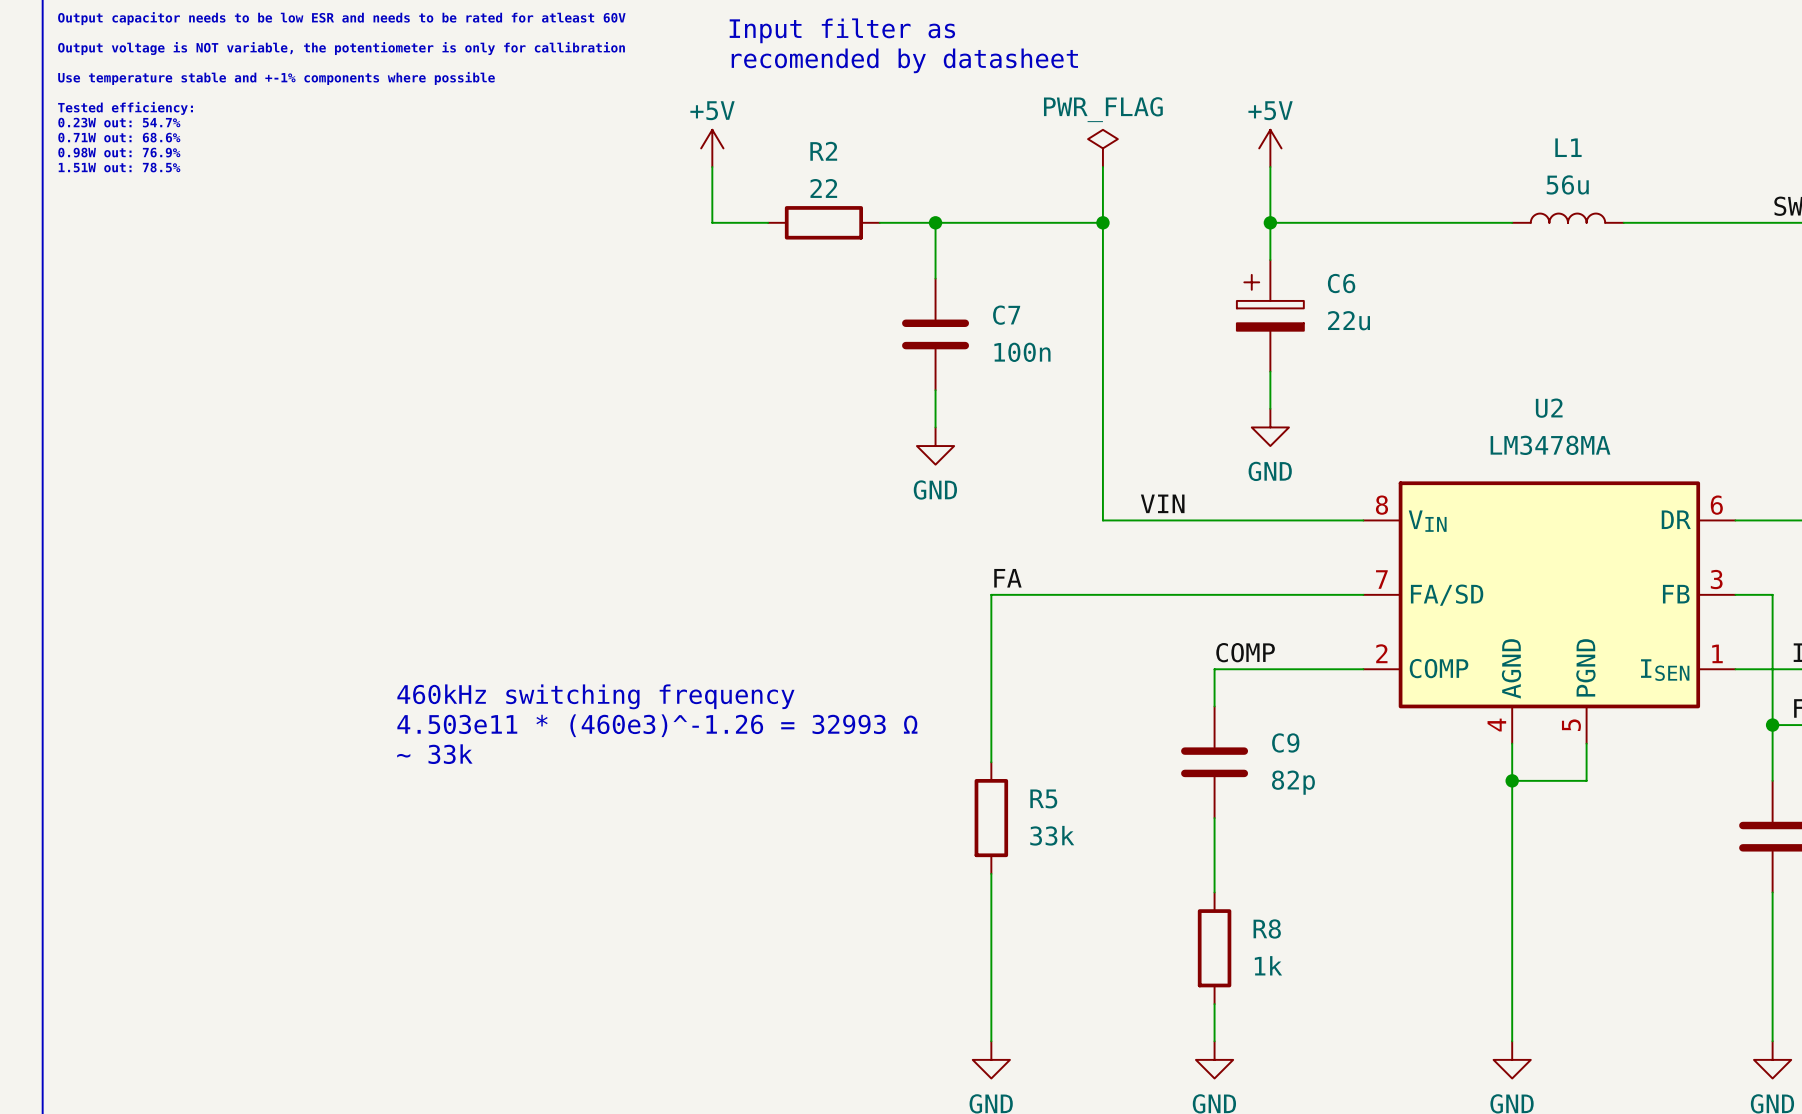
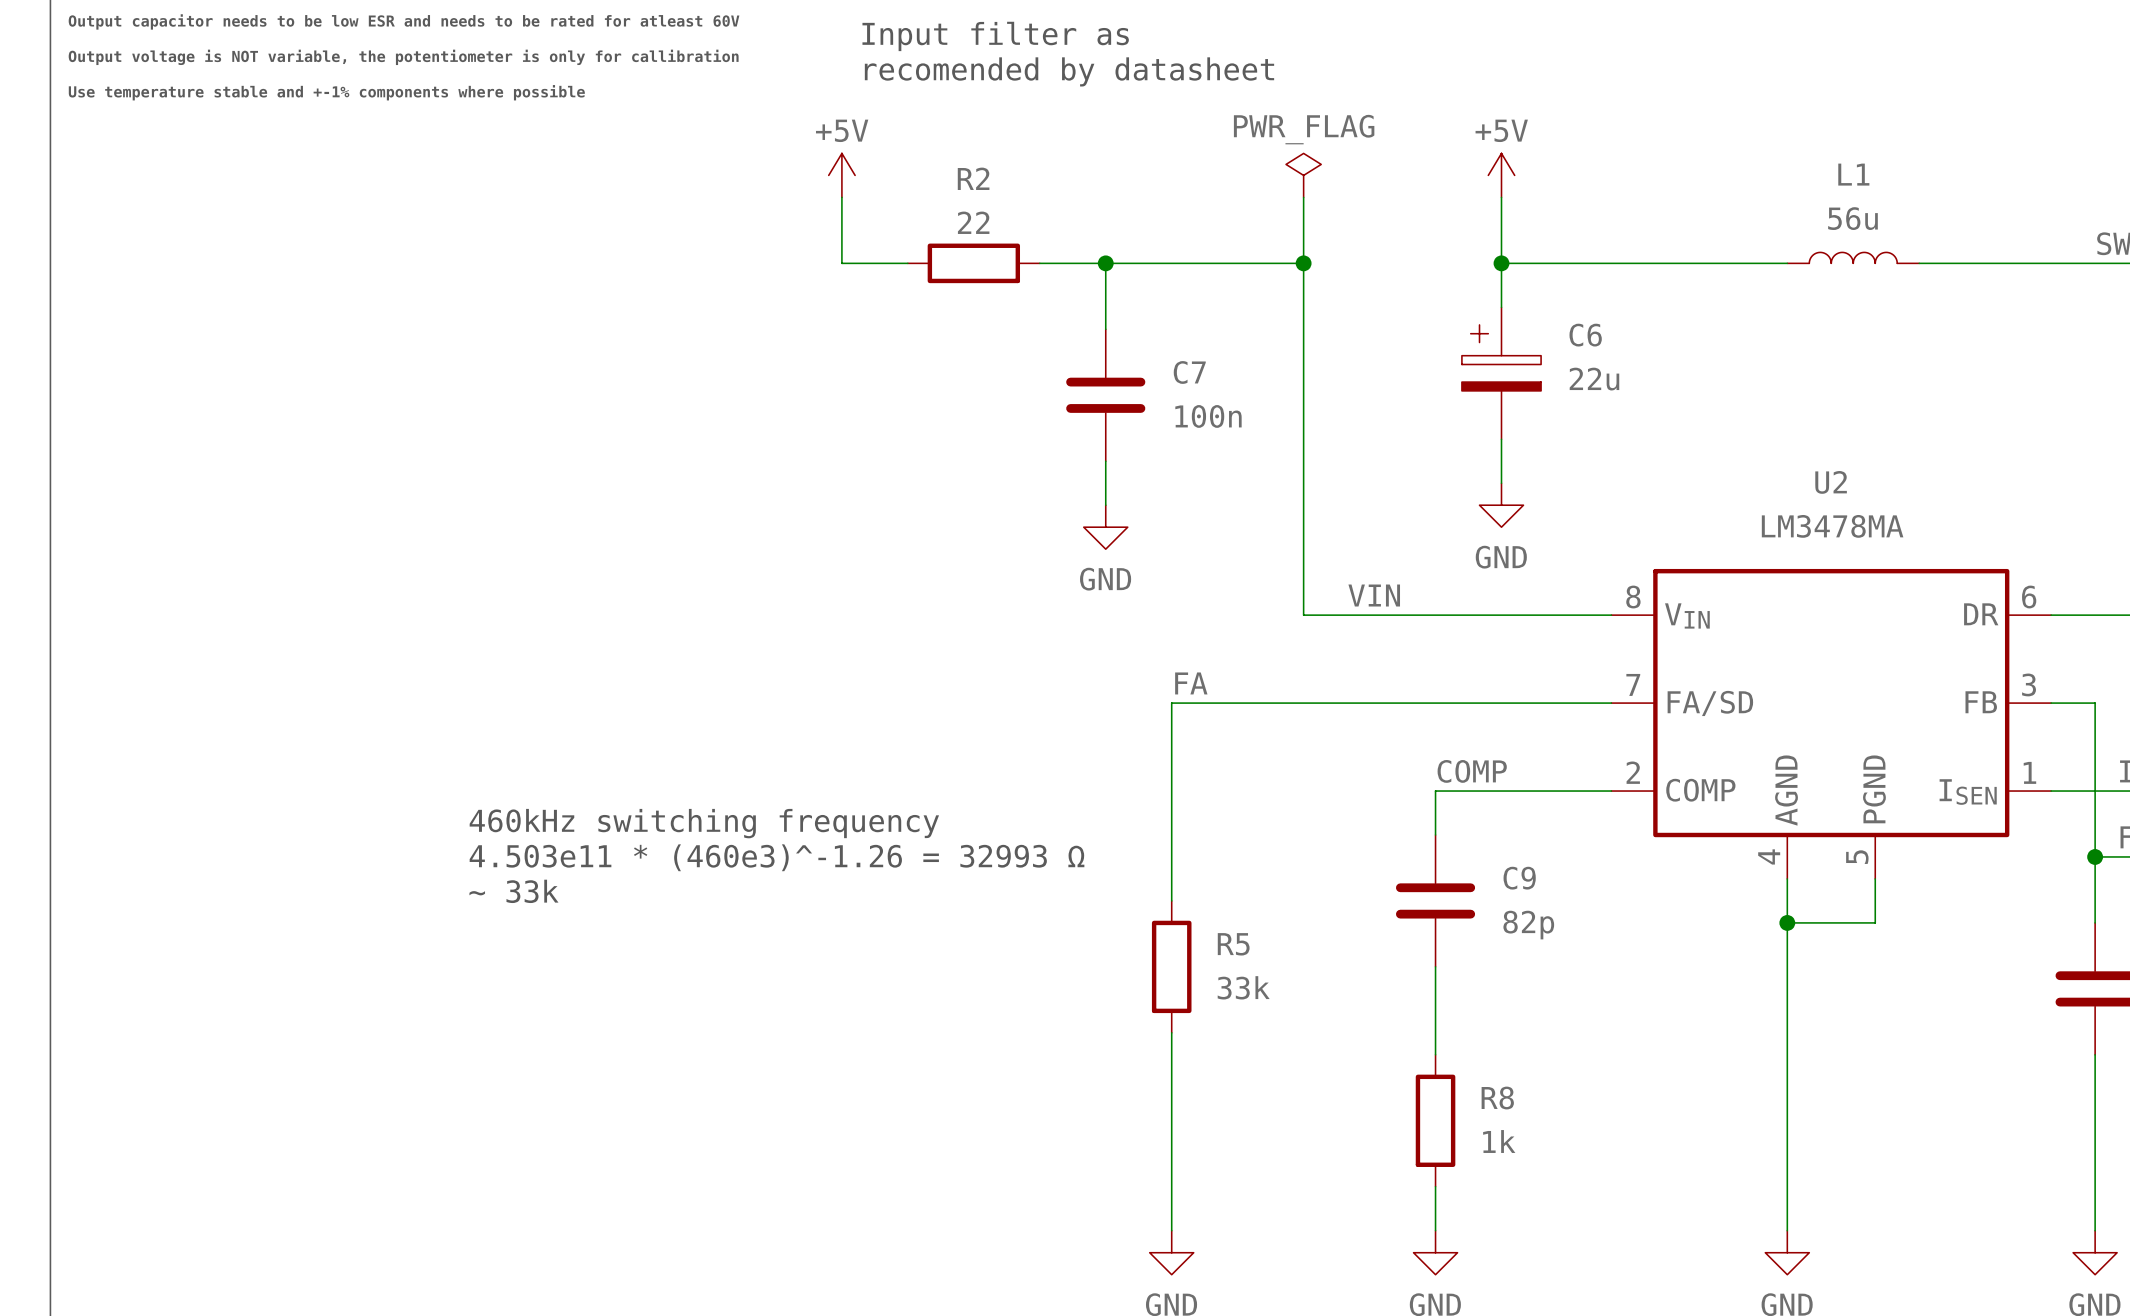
text: Tested efficiency: (125, 108) -> none
text: 0.23W out: 54.7% (119, 122) -> none
text: 0.71W out: 68.6% (119, 137) -> none
text: 0.98W out: 76.9% (119, 152) -> none
text: 1.51W out: 78.5% (119, 167) -> none

